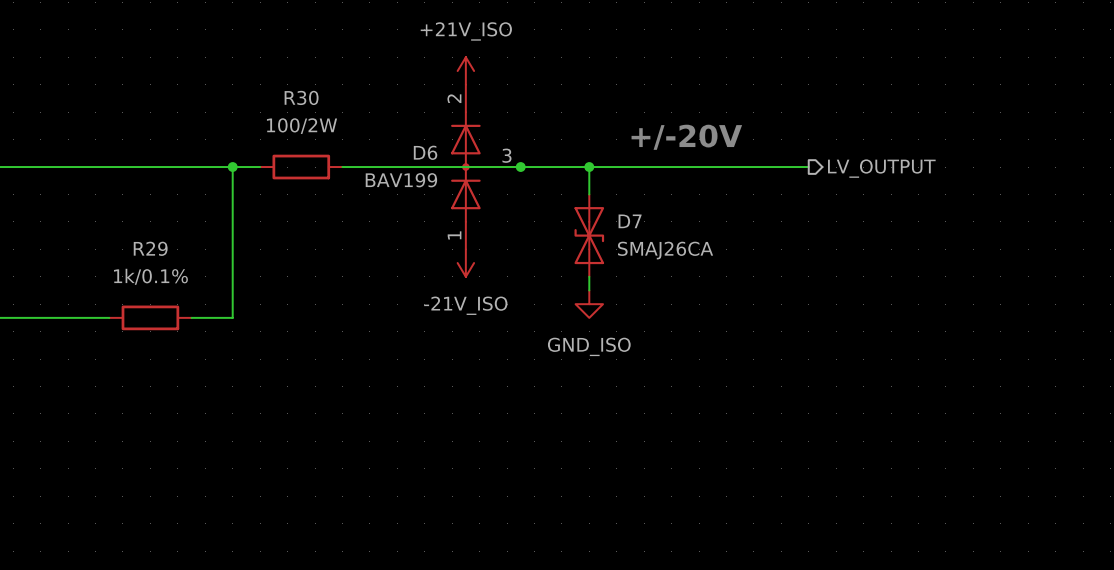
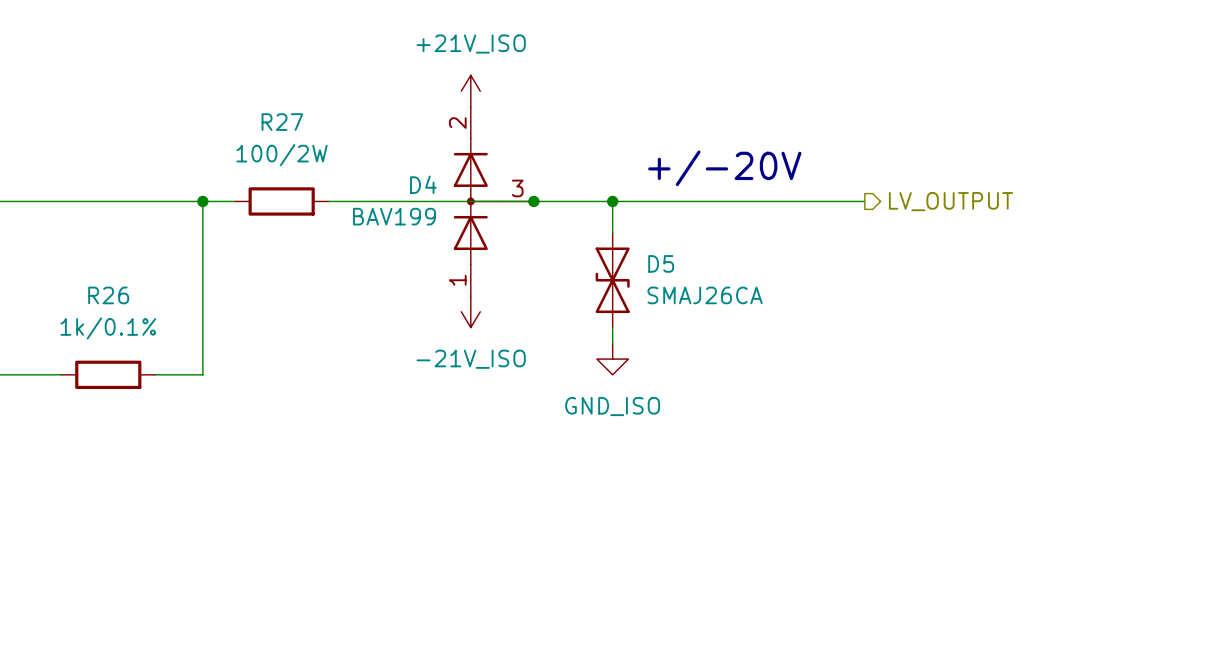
R30 name: R30 (301, 97) -> R27 (282, 122)
D6 name: D6 (425, 152) -> D4 (423, 184)
D7 name: D7 (630, 221) -> D5 (661, 263)
R29 name: R29 (150, 248) -> R26 (108, 295)

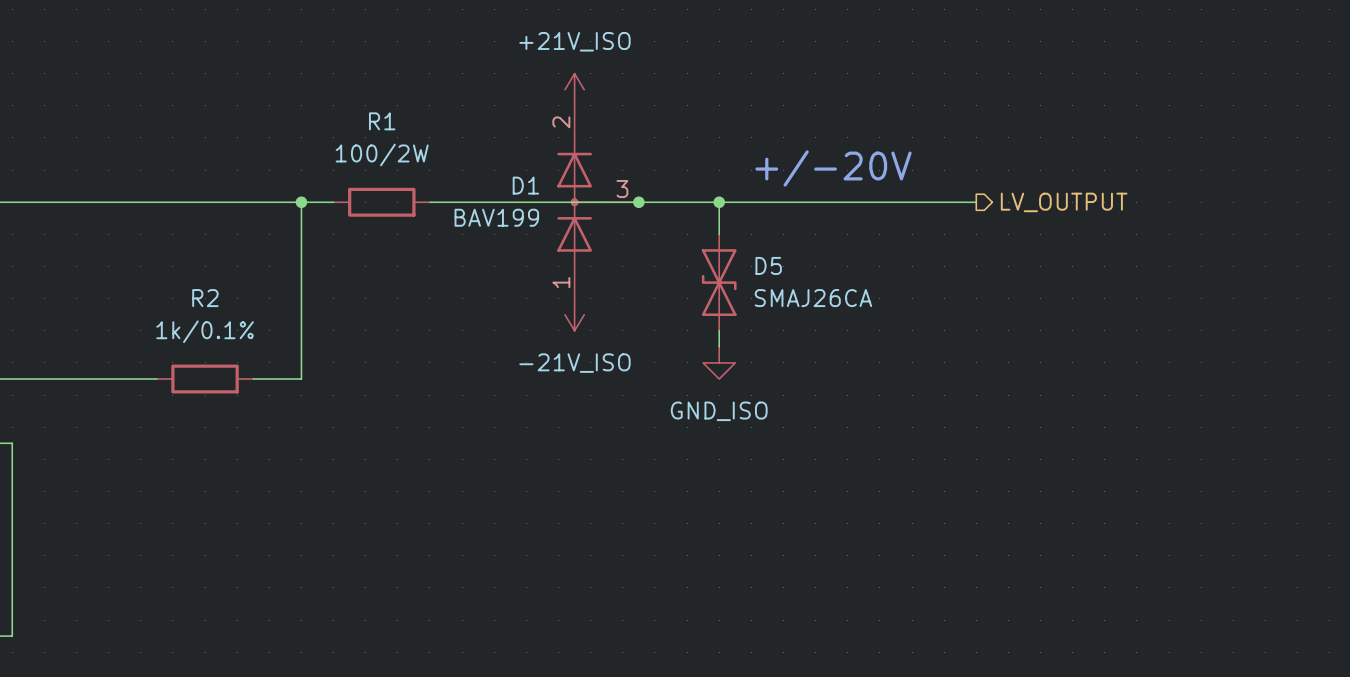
R27 name: R27 (282, 122) -> R1 (382, 121)
D4 name: D4 (423, 184) -> D1 (525, 185)
R26 name: R26 (108, 295) -> R2 (205, 298)

